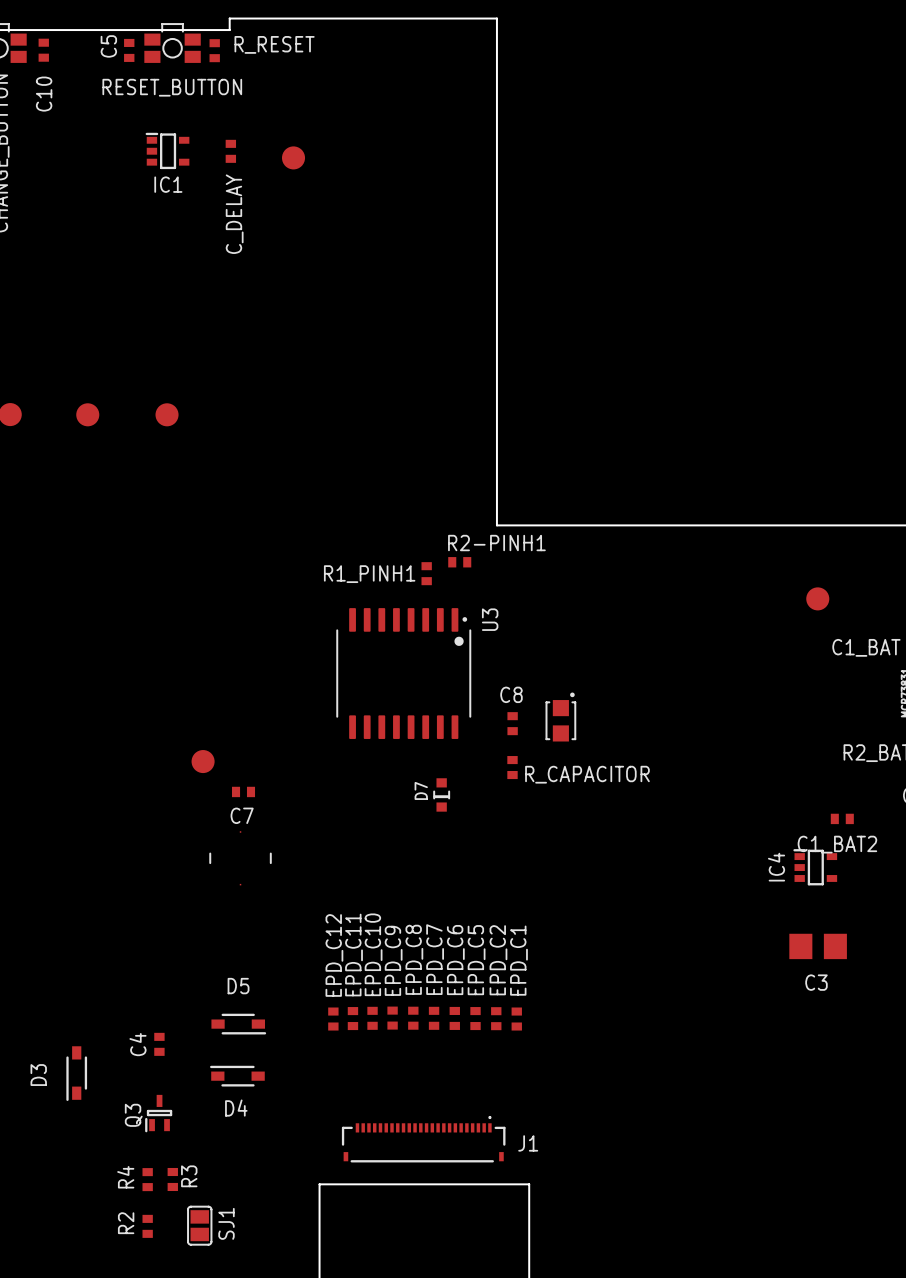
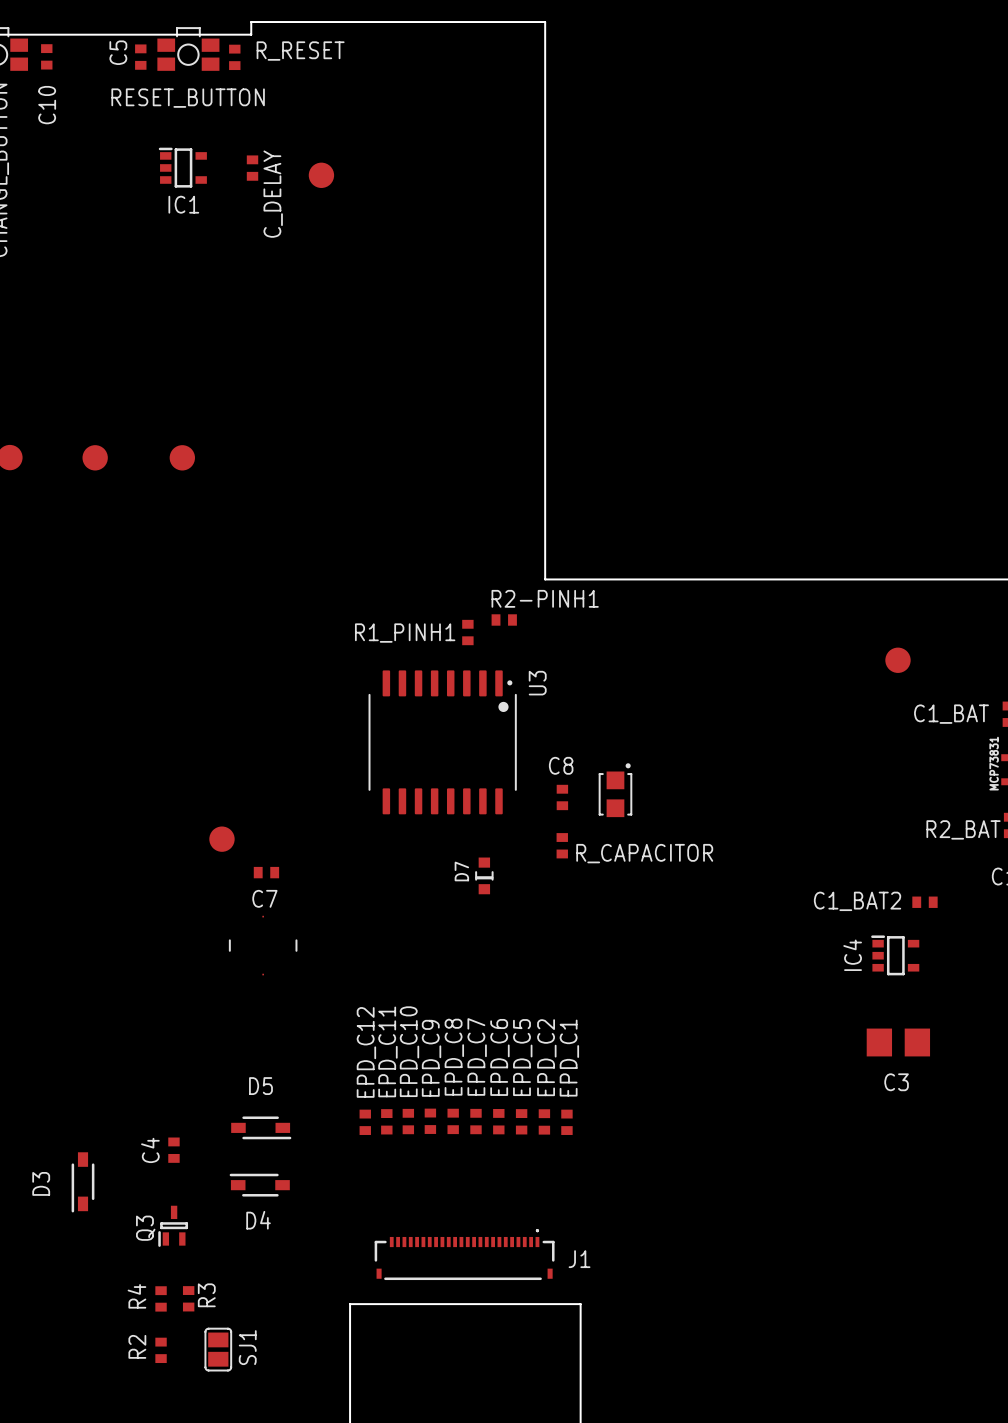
C_DELAY name position: C_DELAY (234, 214) -> C_DELAY (273, 194)
C1_BAT2 name position: C1_BAT2 (837, 844) -> C1_BAT2 (857, 901)

